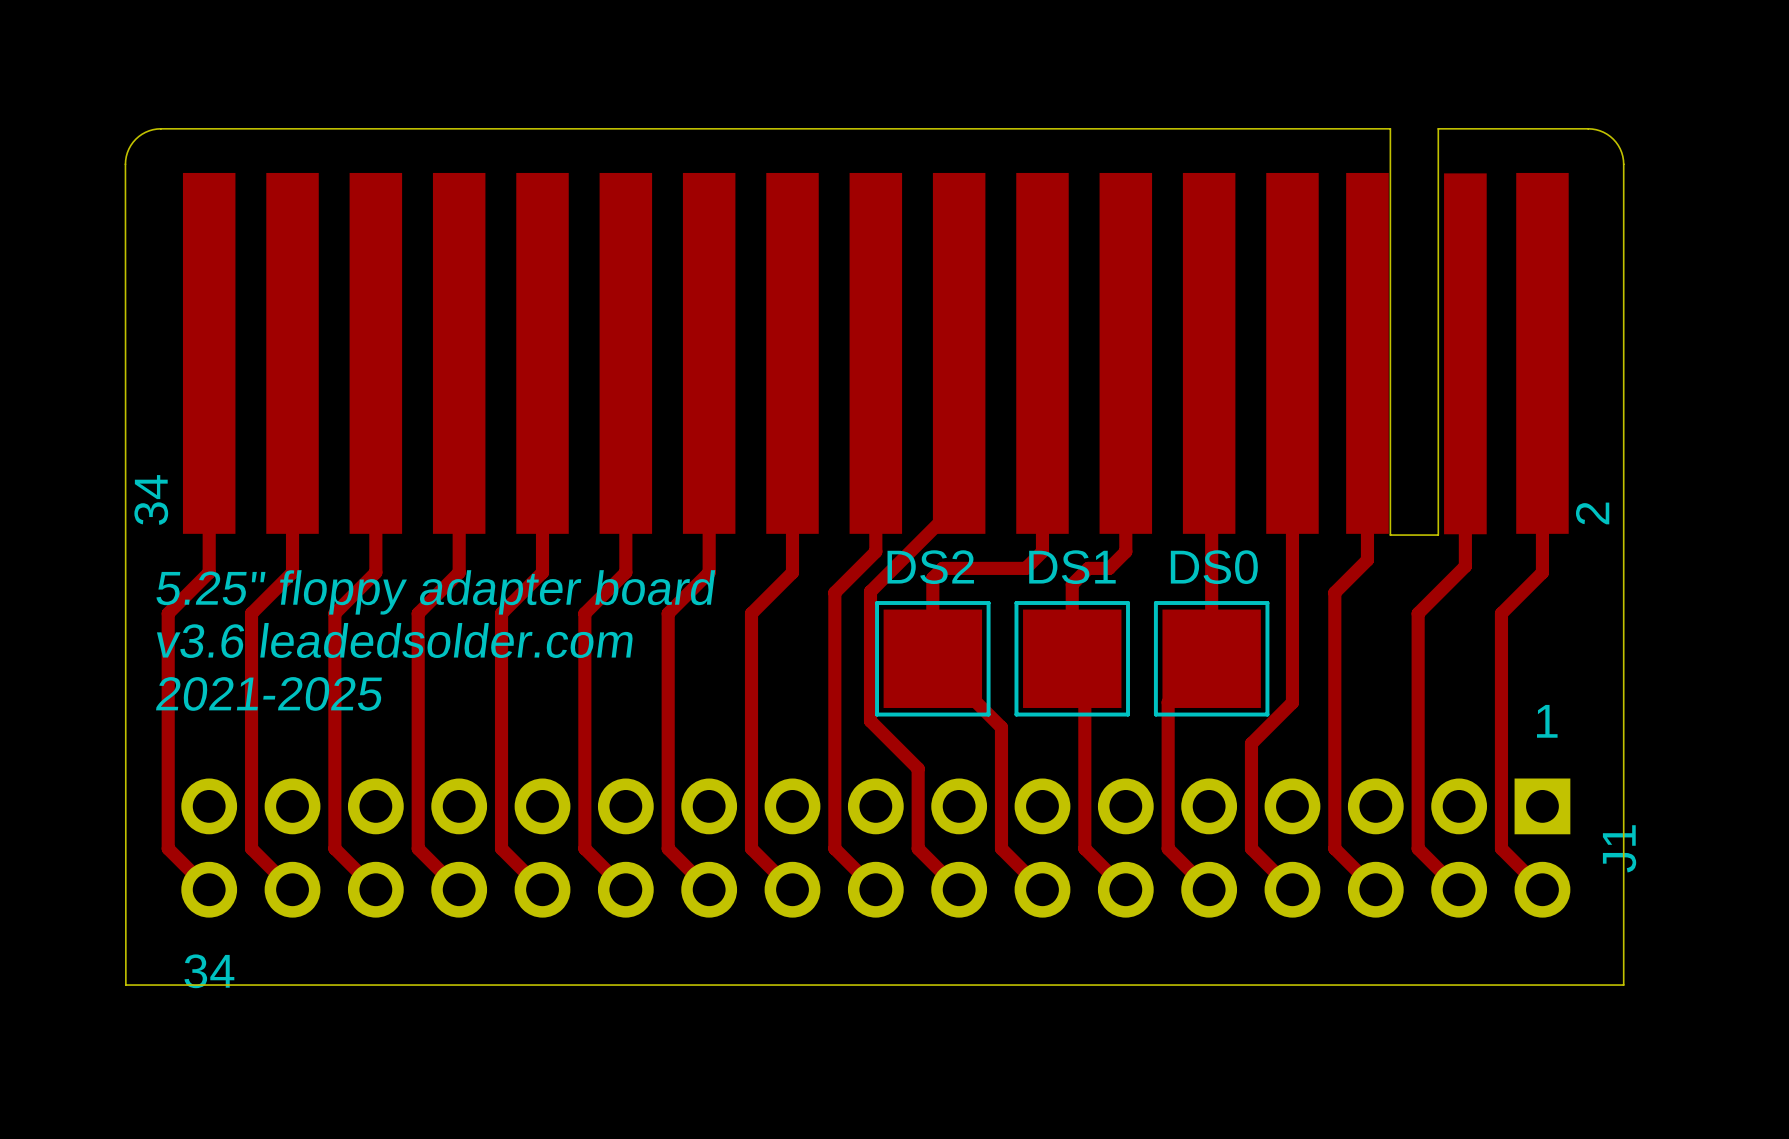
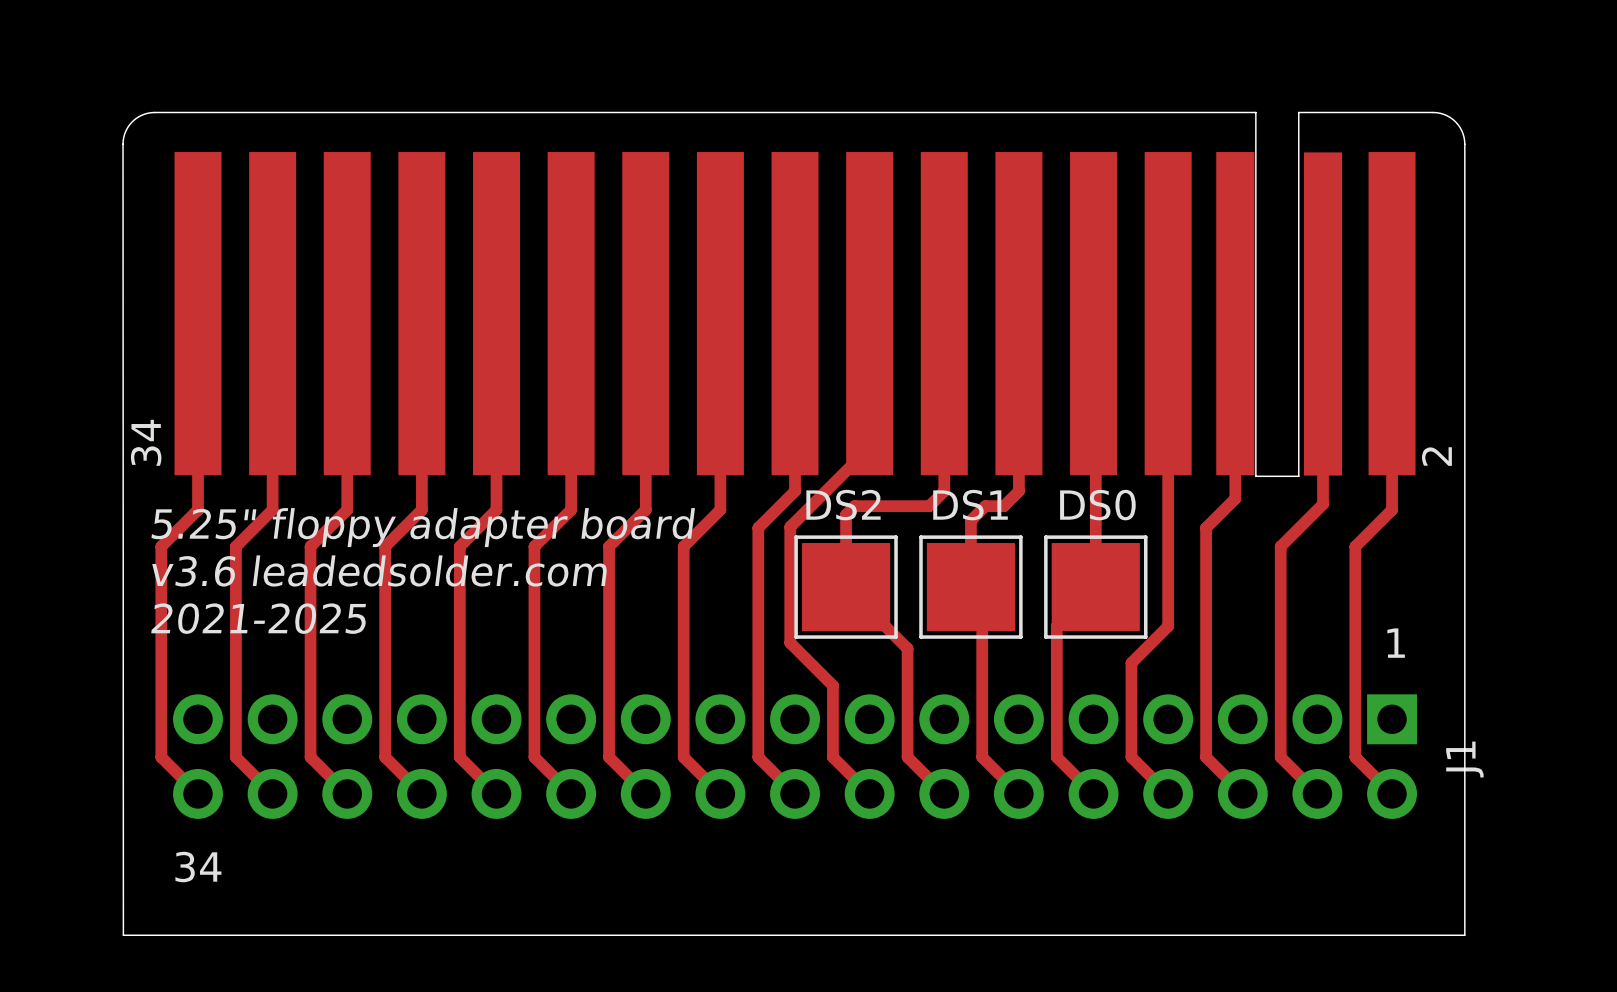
board edge: (125, 164) (125, 985) (1623, 985) -> (123, 144) (123, 935) (1464, 935) (1464, 879)

